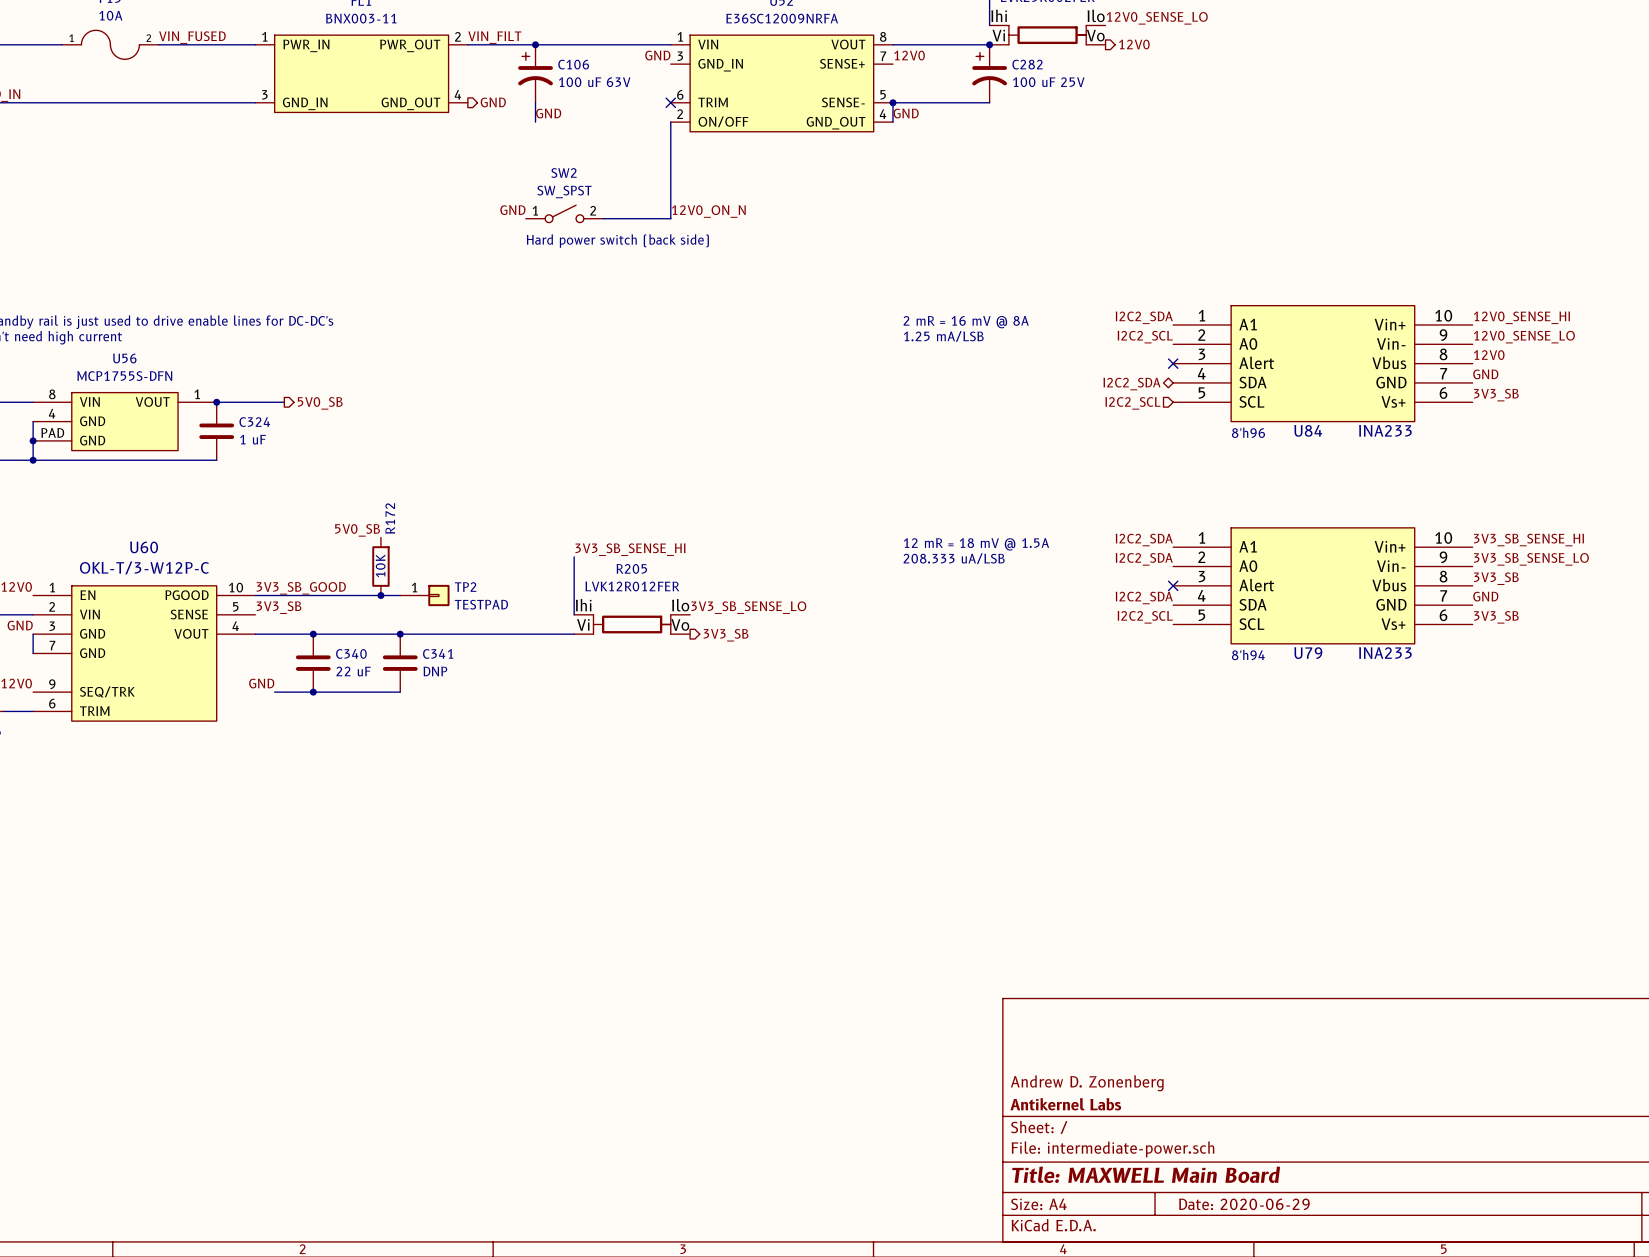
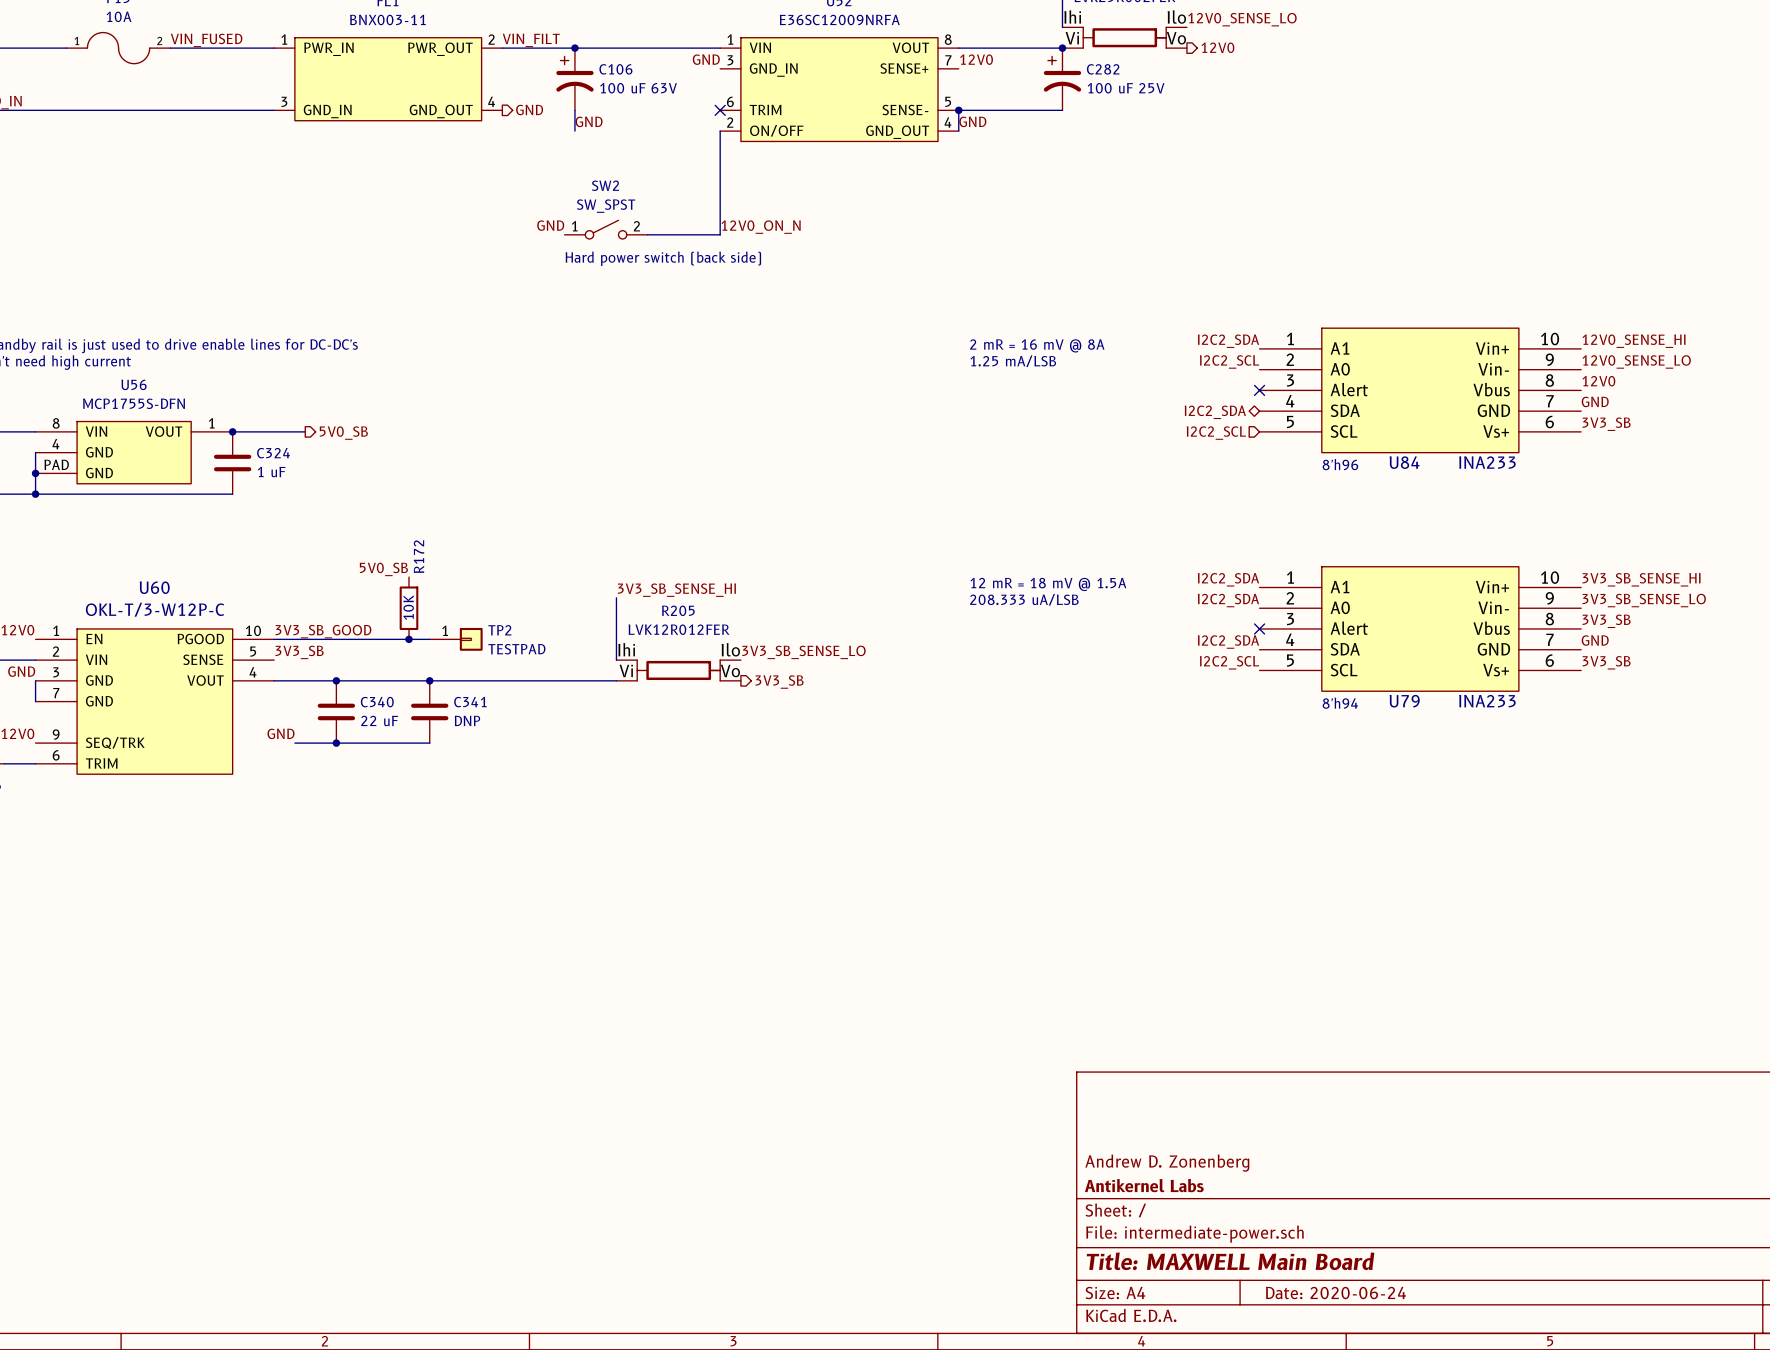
title block: Date: 2020-06-29 (1244, 1204) -> Date: 2020-06-24 (1335, 1293)

